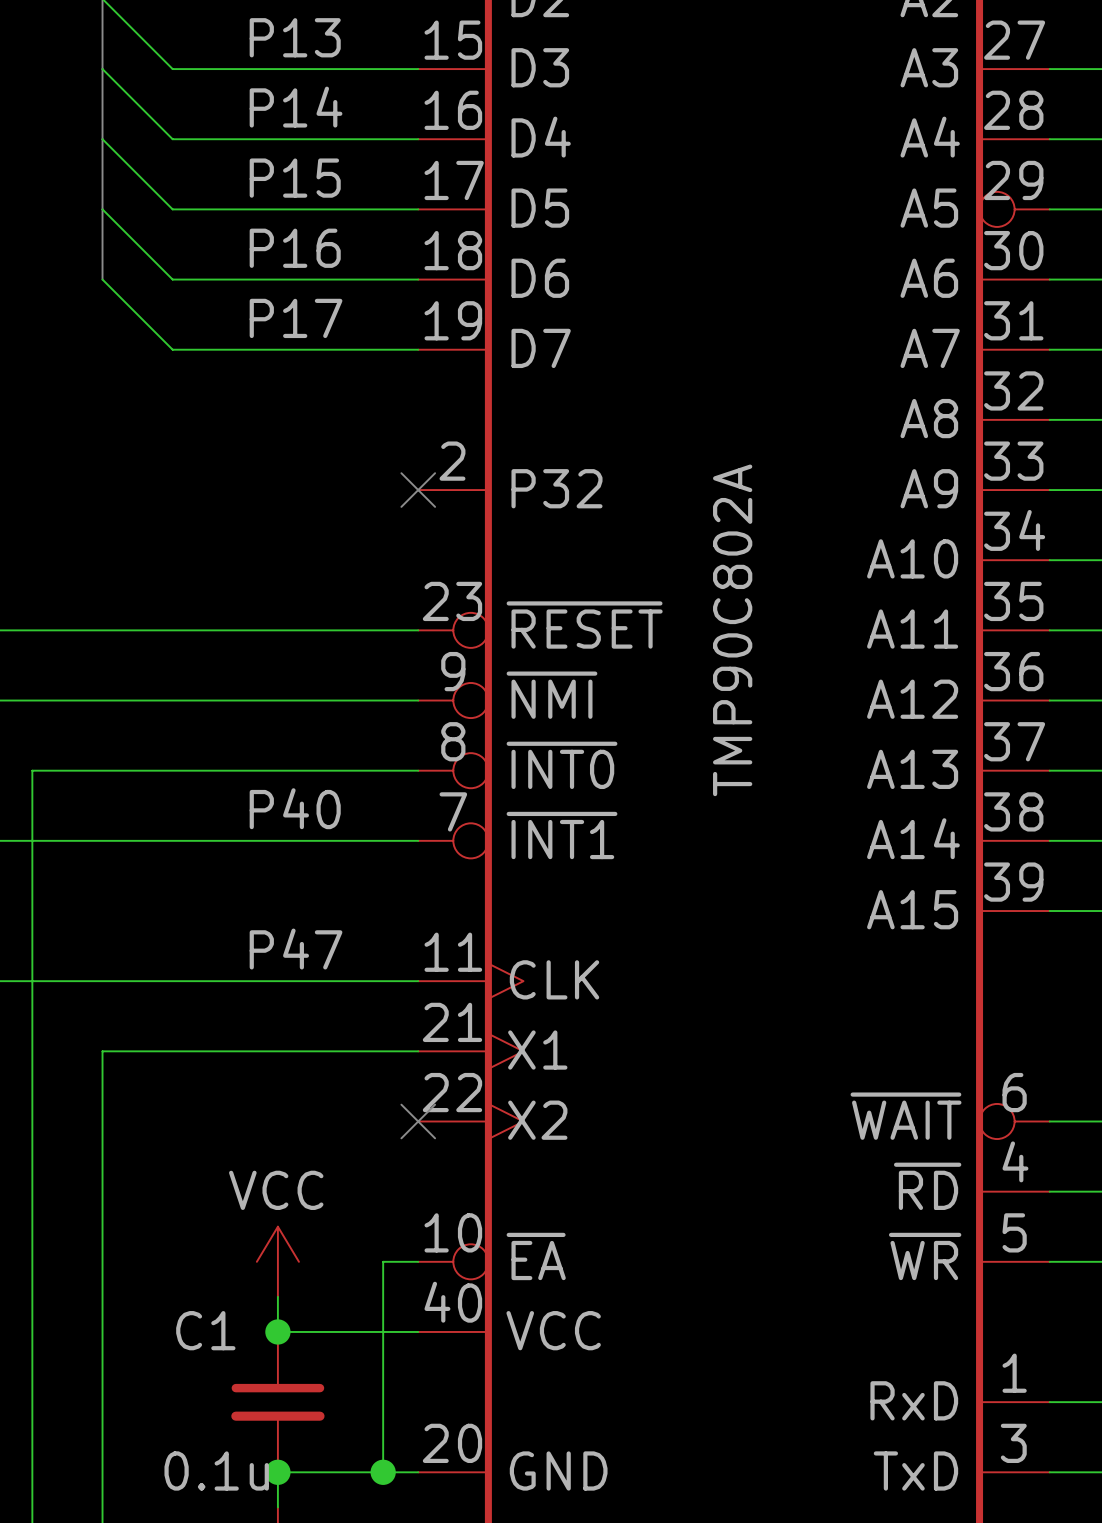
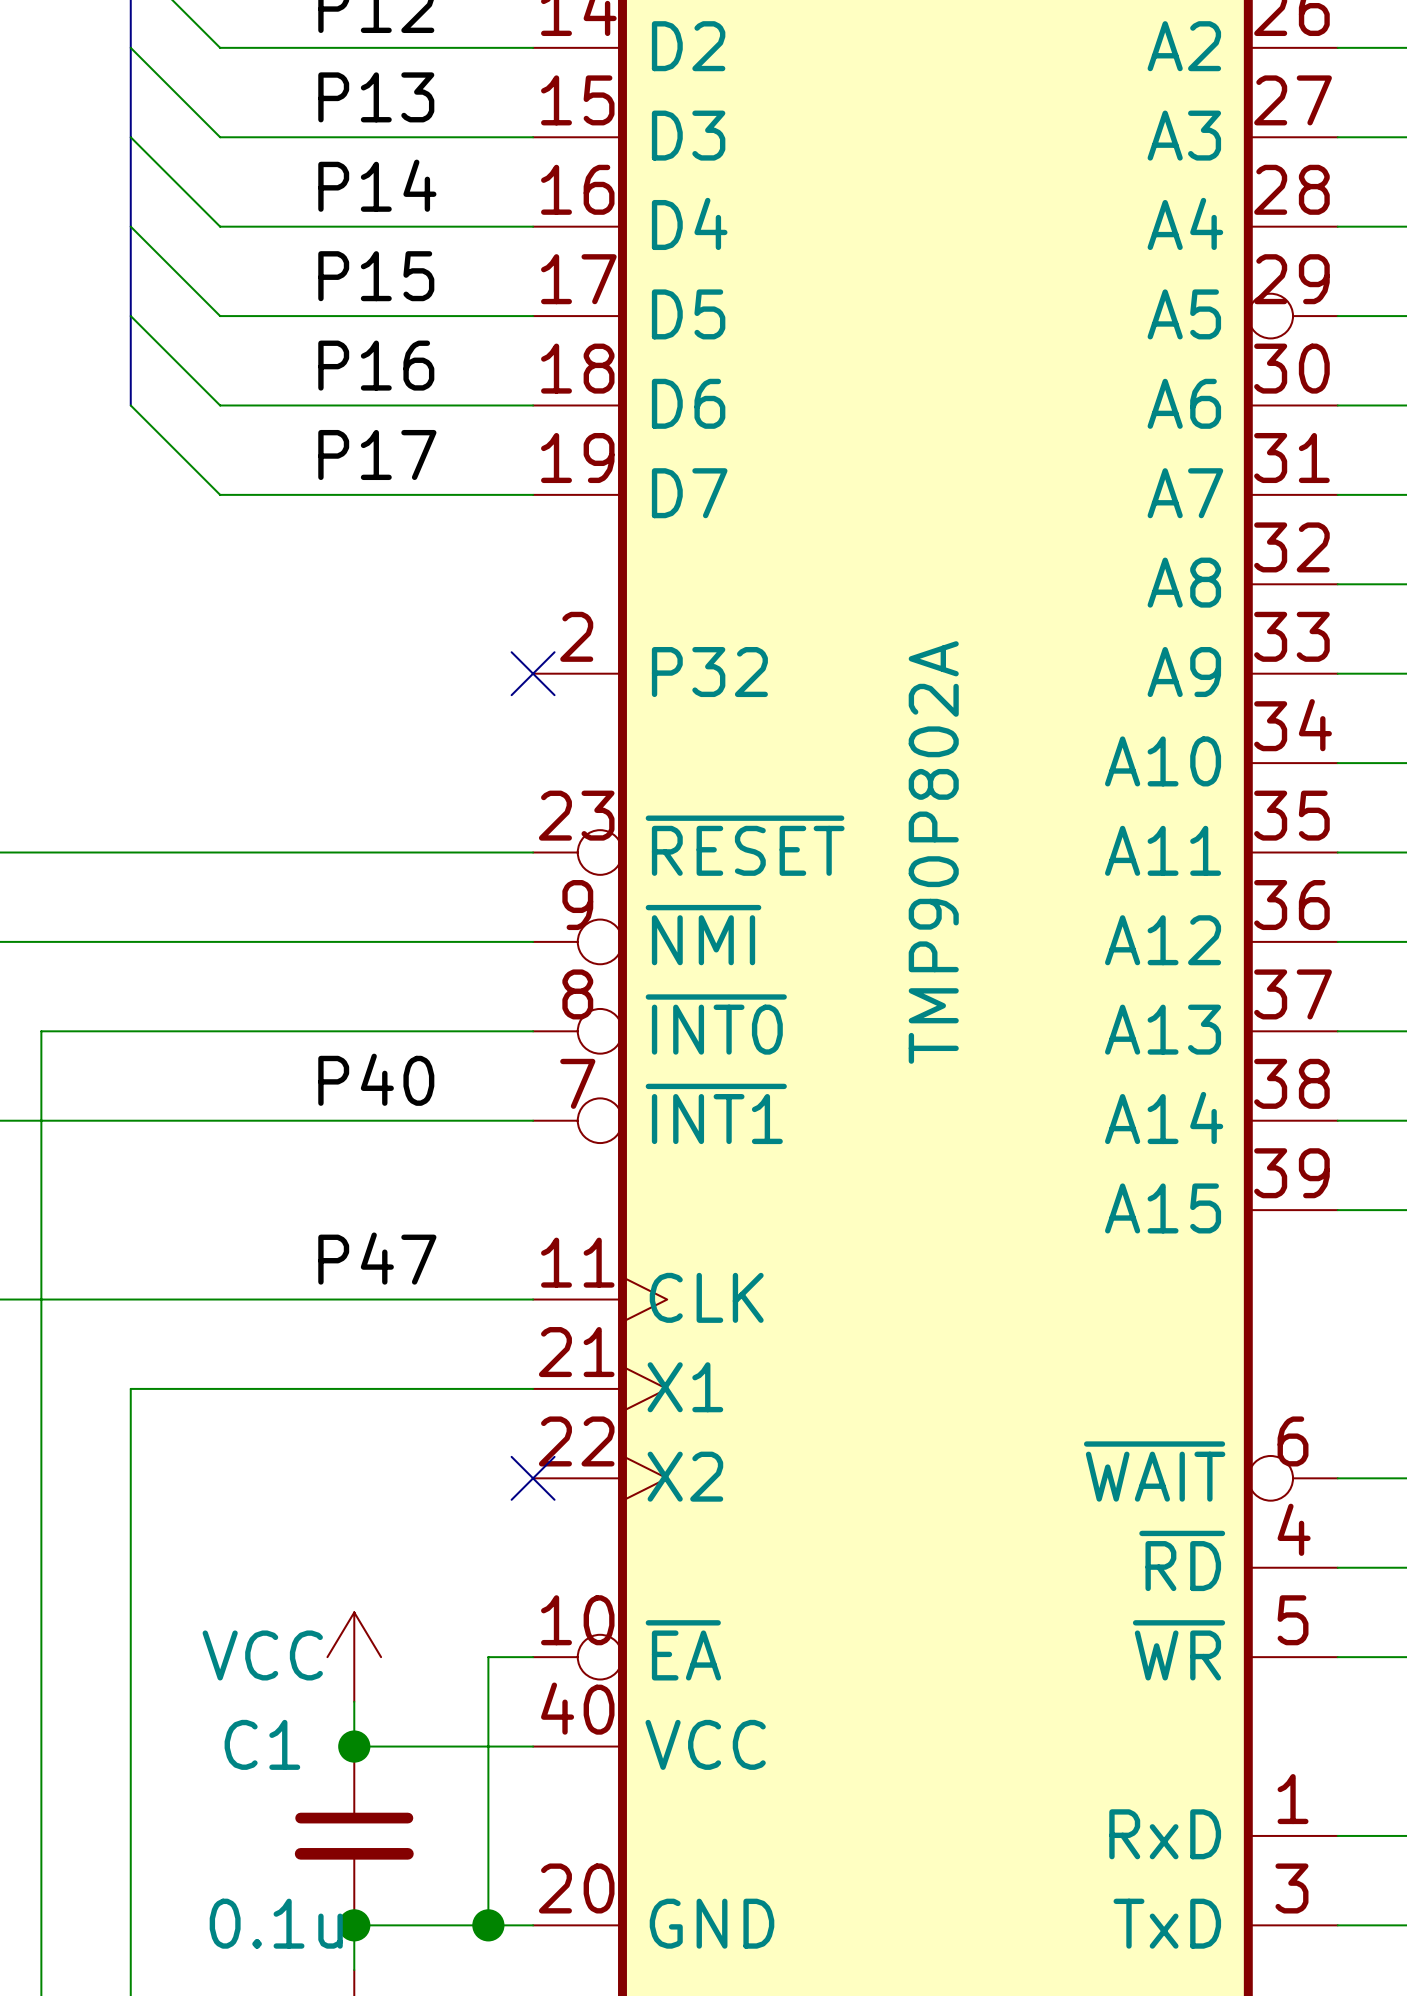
part value: TMP90C802A (732, 630) -> TMP90P802A (933, 852)
power symbol text position: VCC (276, 1190) -> VCC (262, 1655)

